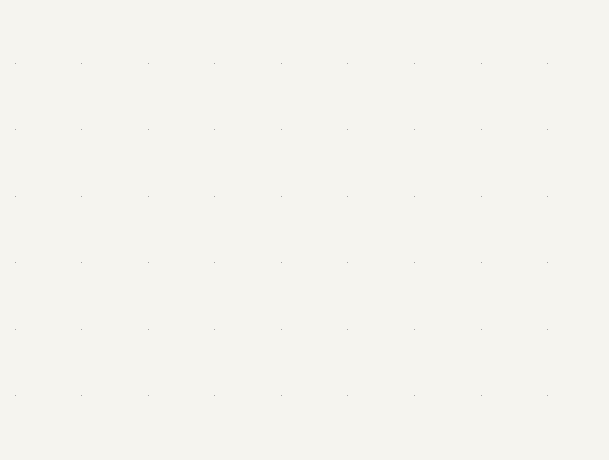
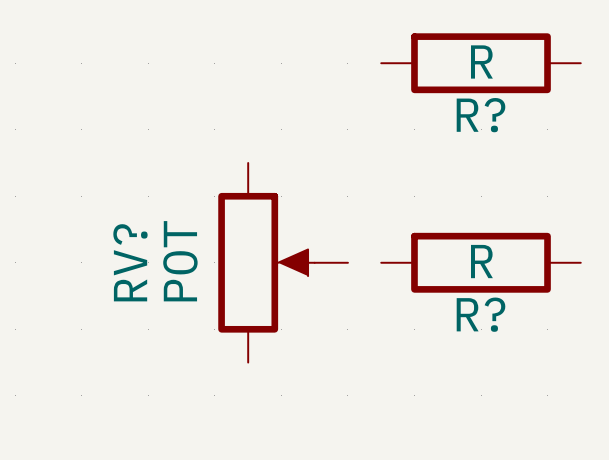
R?: none -> R (481, 63)
RV?: none -> POT (283, 262)
R?: none -> R (481, 262)

